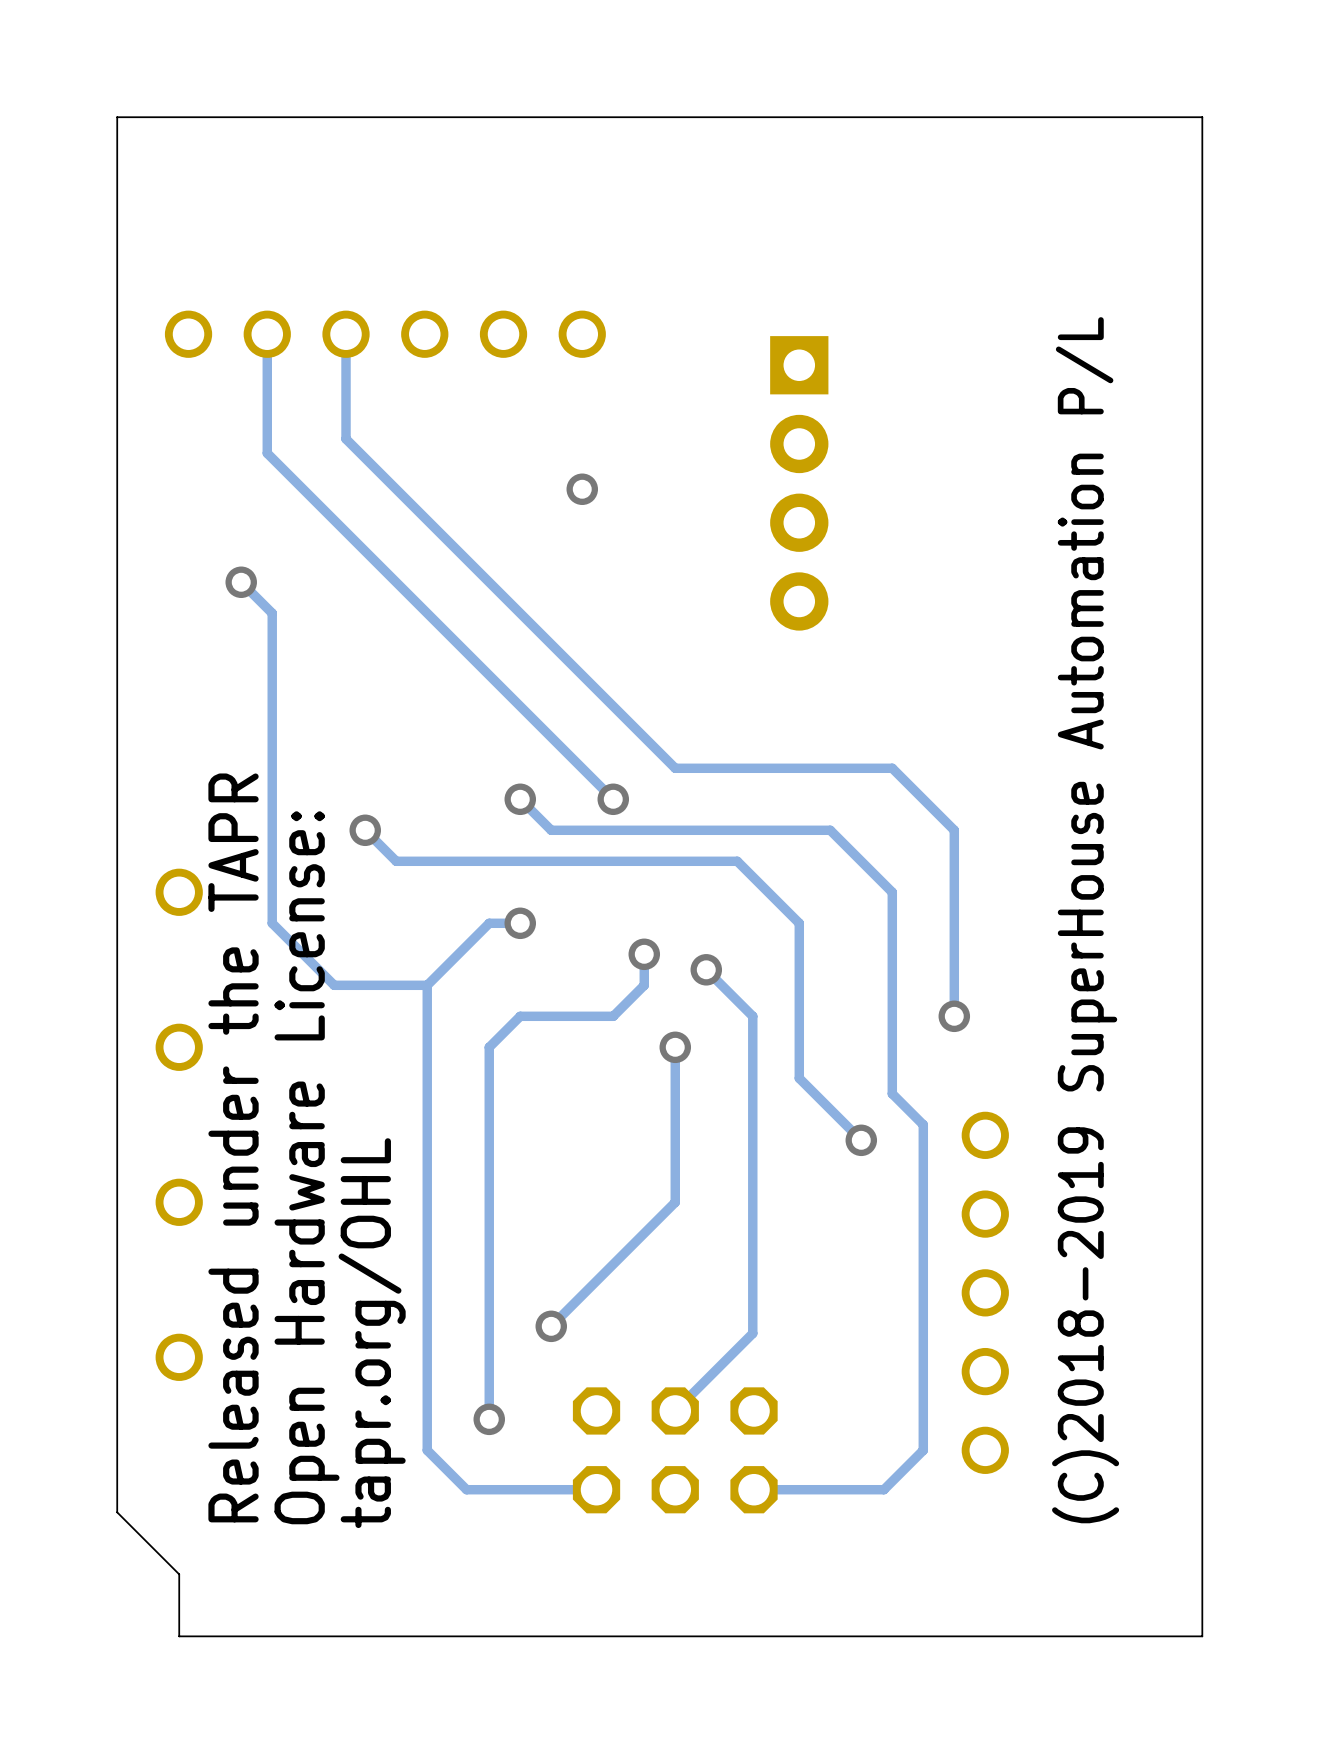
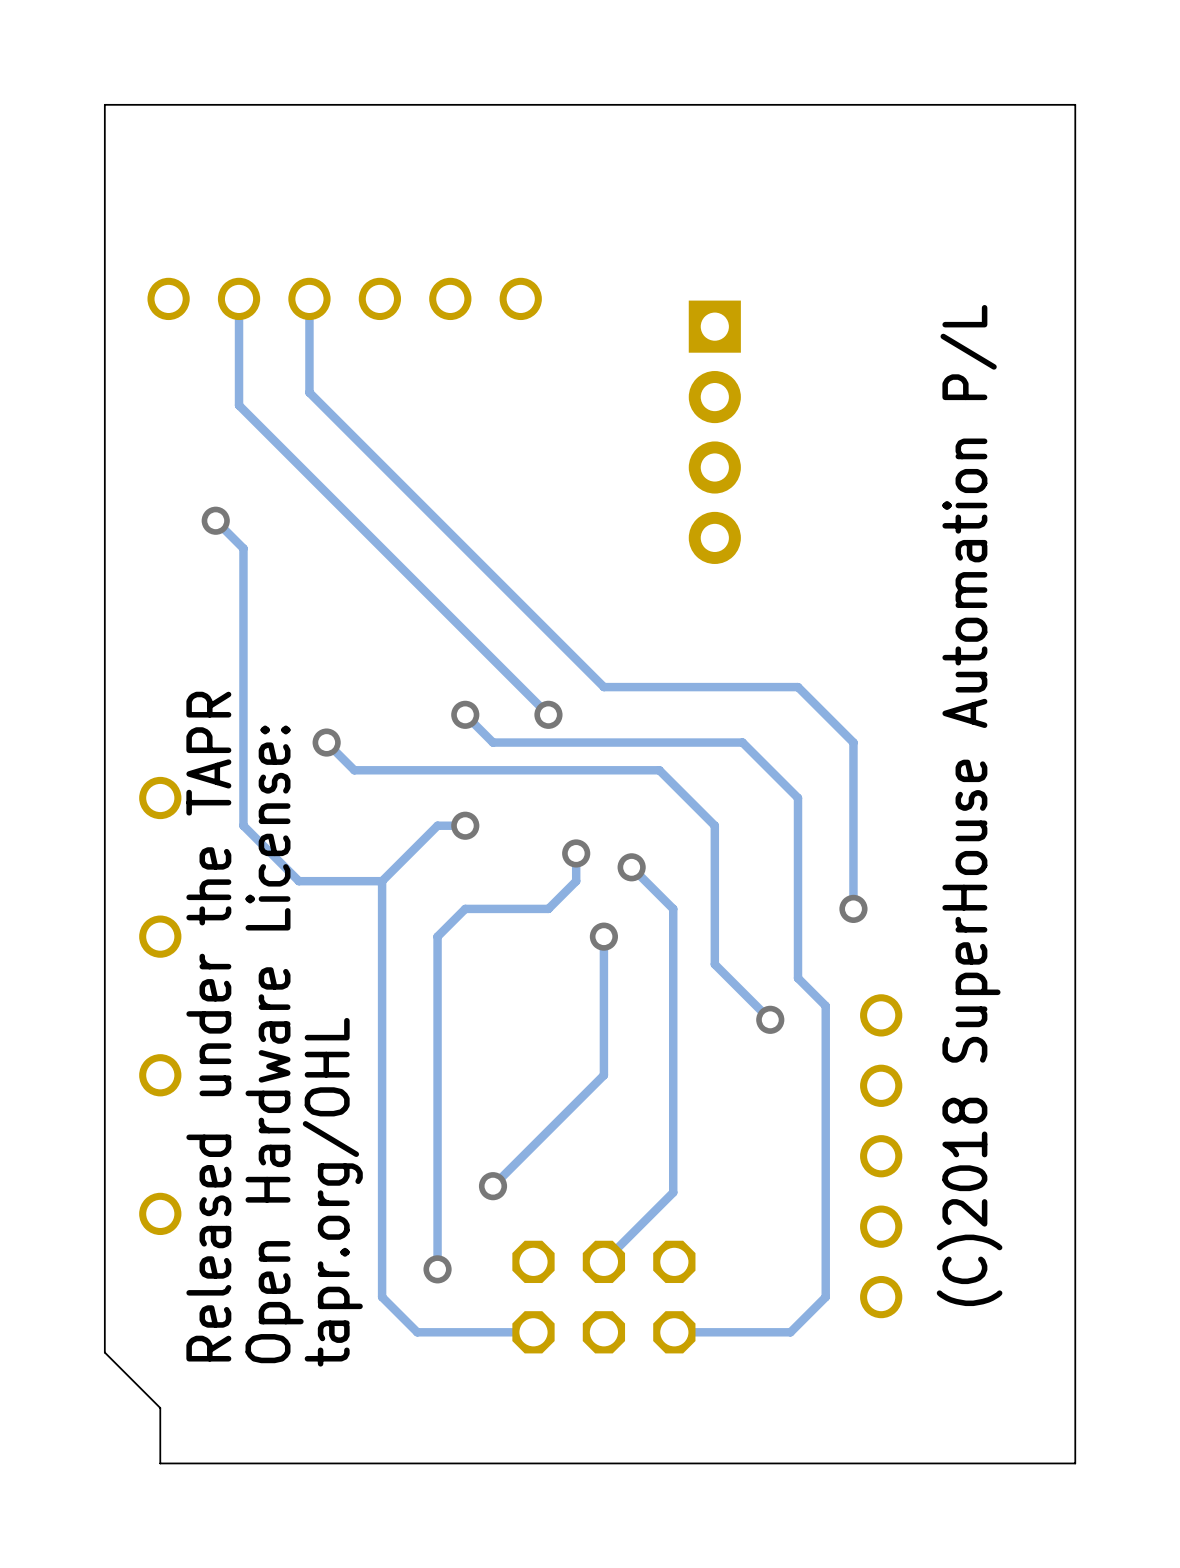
via: (582, 489) -> none
text: (C)2018-2019 SuperHouse Automation P/L (1085, 920) -> (C)2018 SuperHouse Automation P/L (969, 805)

